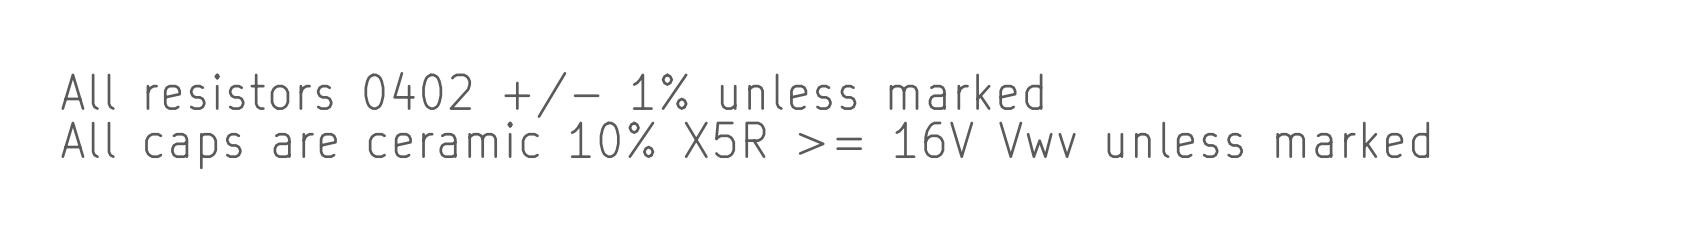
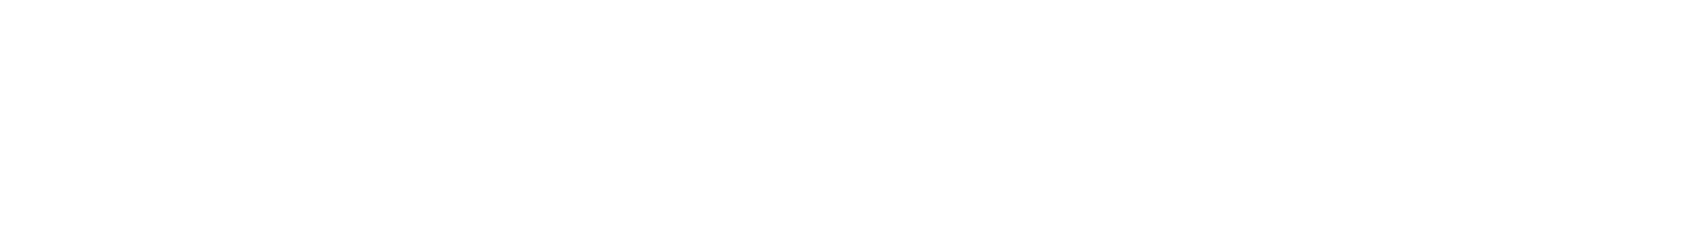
text: All resistors 0402 +/- 1% unless marked (551, 94) -> none
text: All caps are ceramic 10% X5R >= 16V Vwv unless marked (745, 145) -> none

